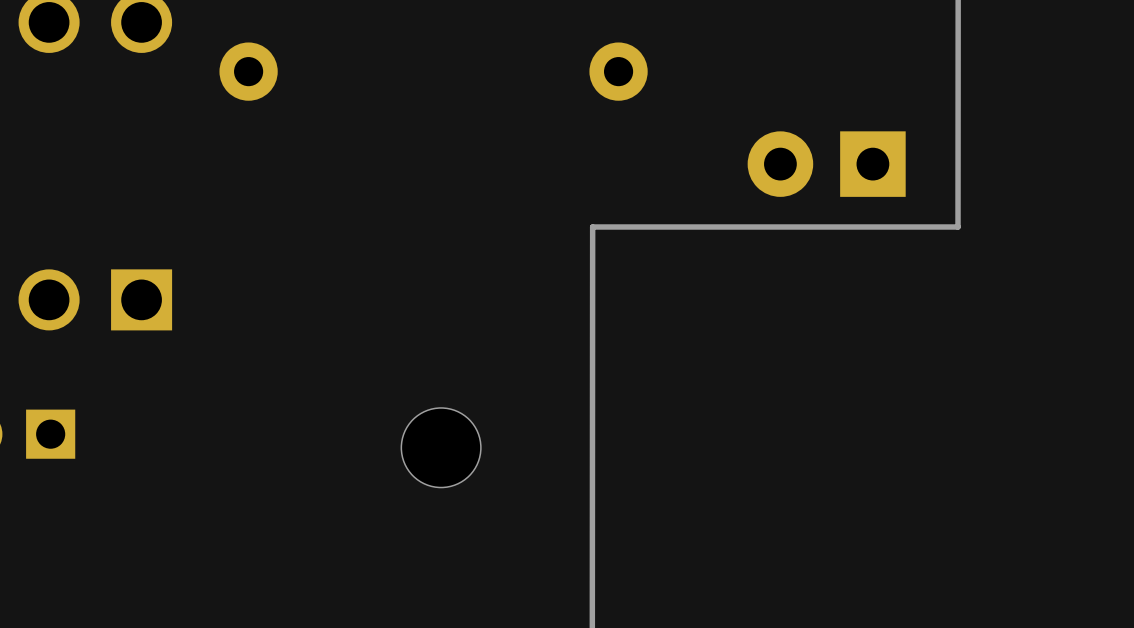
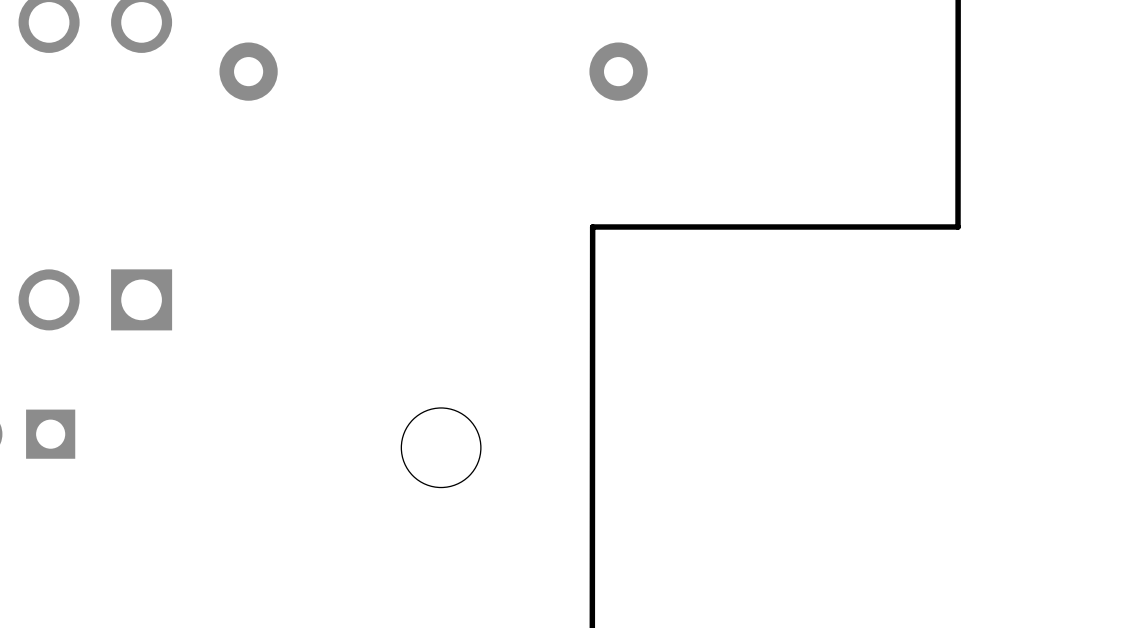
part: (826, 164) -> none

